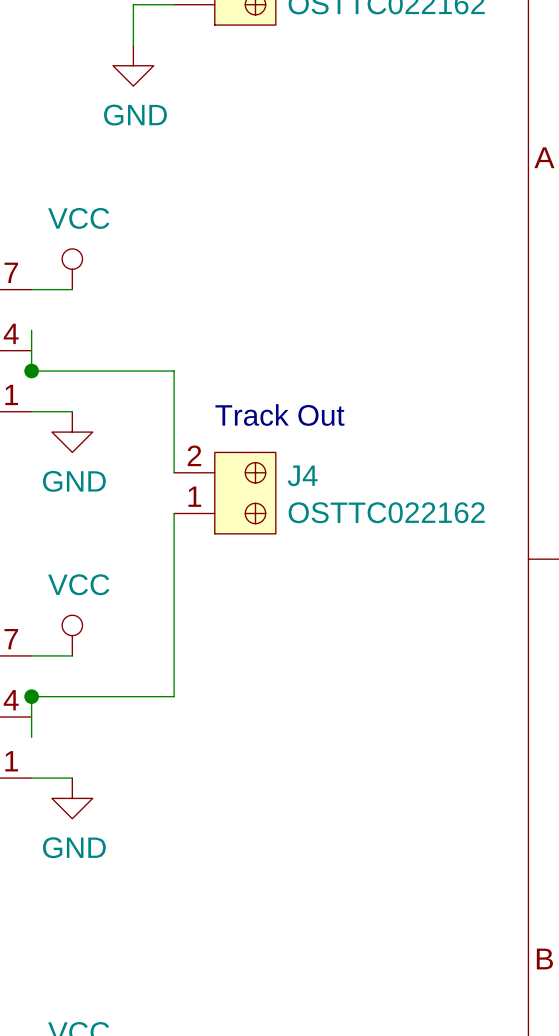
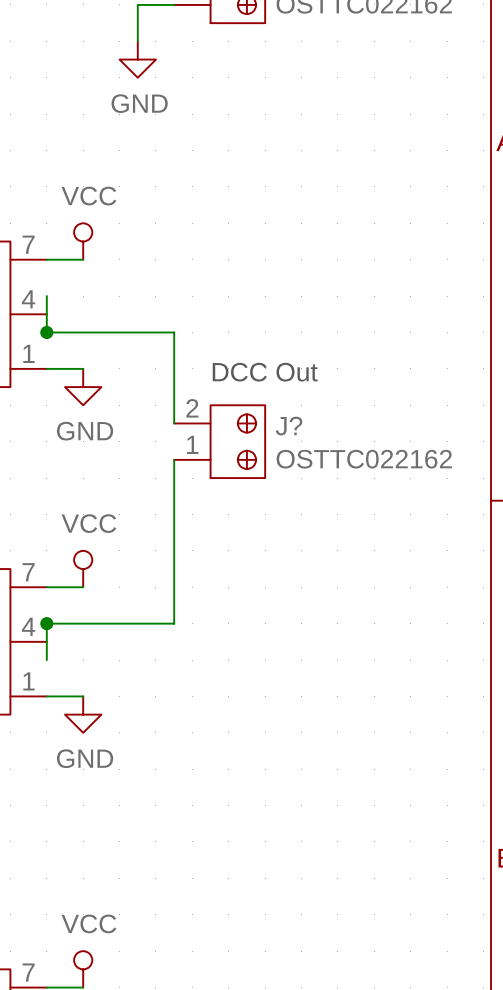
text: Track Out (279, 415) -> DCC Out (265, 372)
J4 name: J4 (302, 475) -> J? (289, 426)

